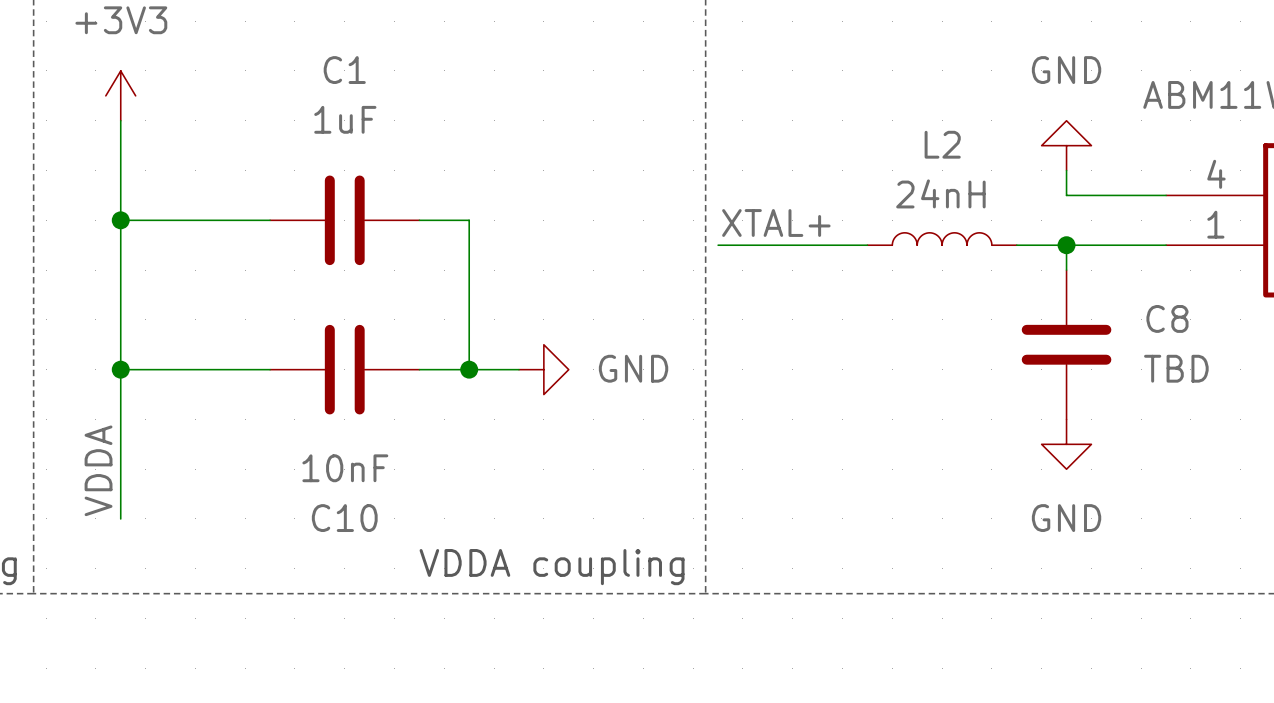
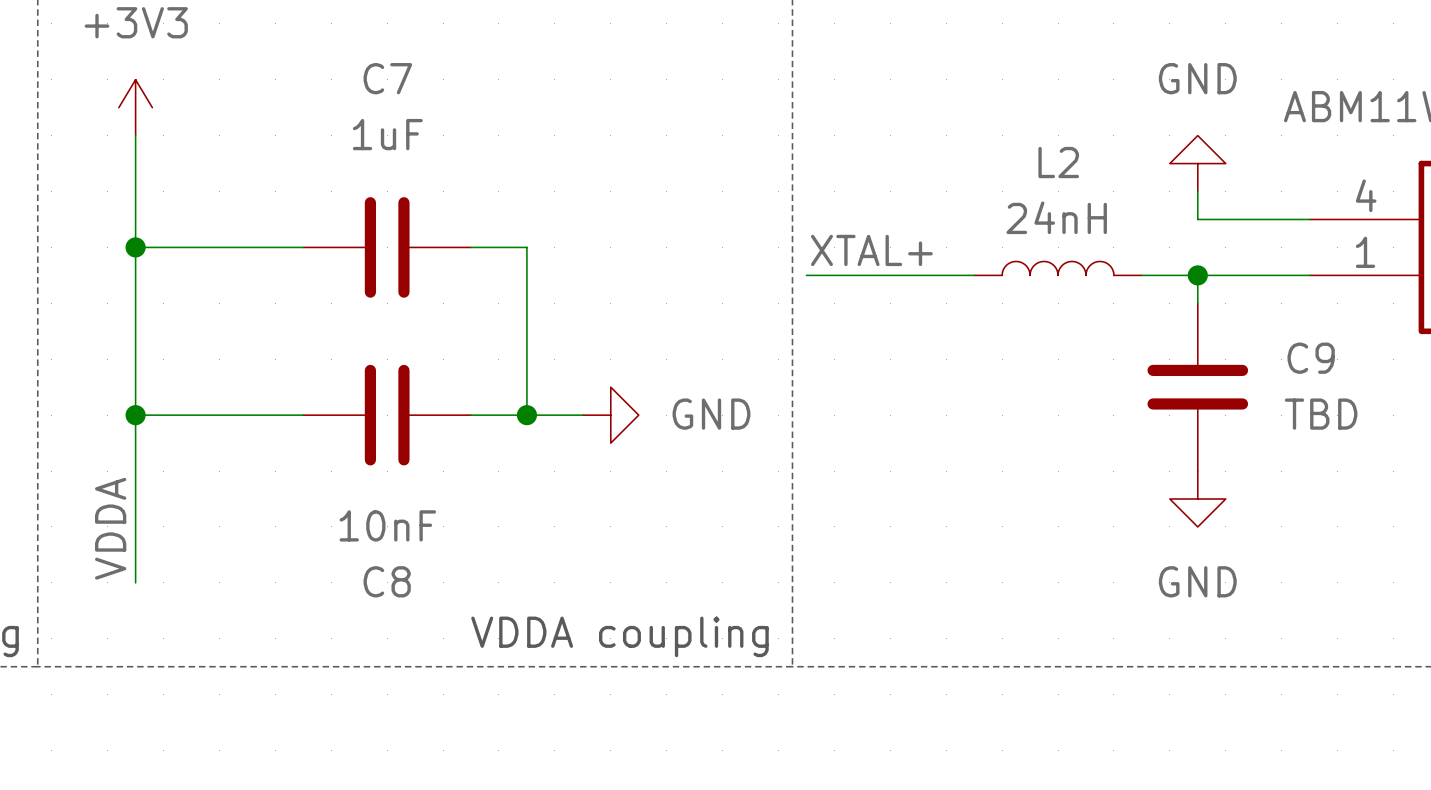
C1 name: C1 (344, 70) -> C7 (387, 78)
C8 name: C8 (1167, 318) -> C9 (1311, 358)
C10 name: C10 (344, 518) -> C8 (387, 581)

